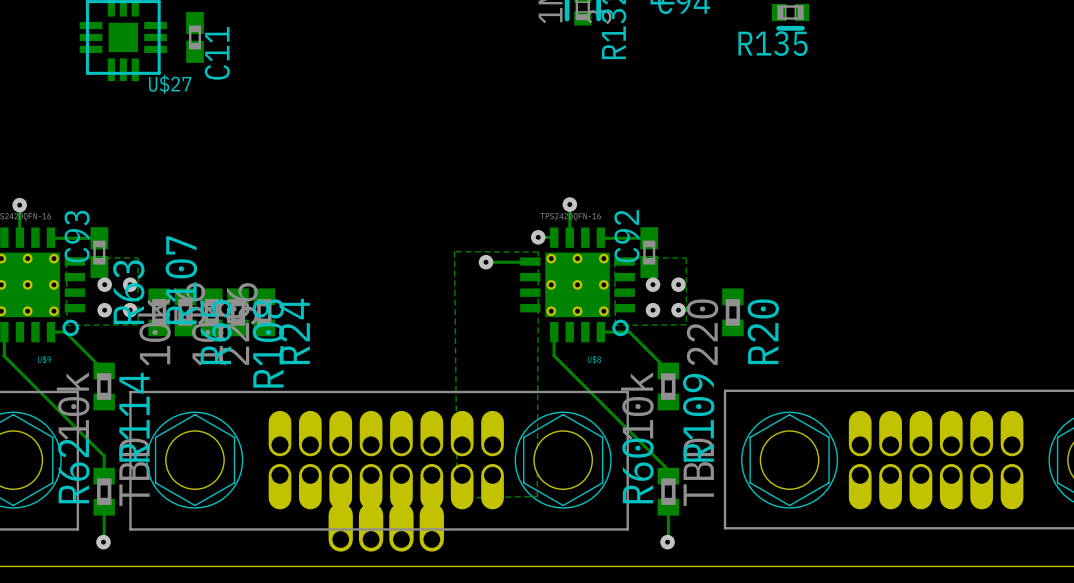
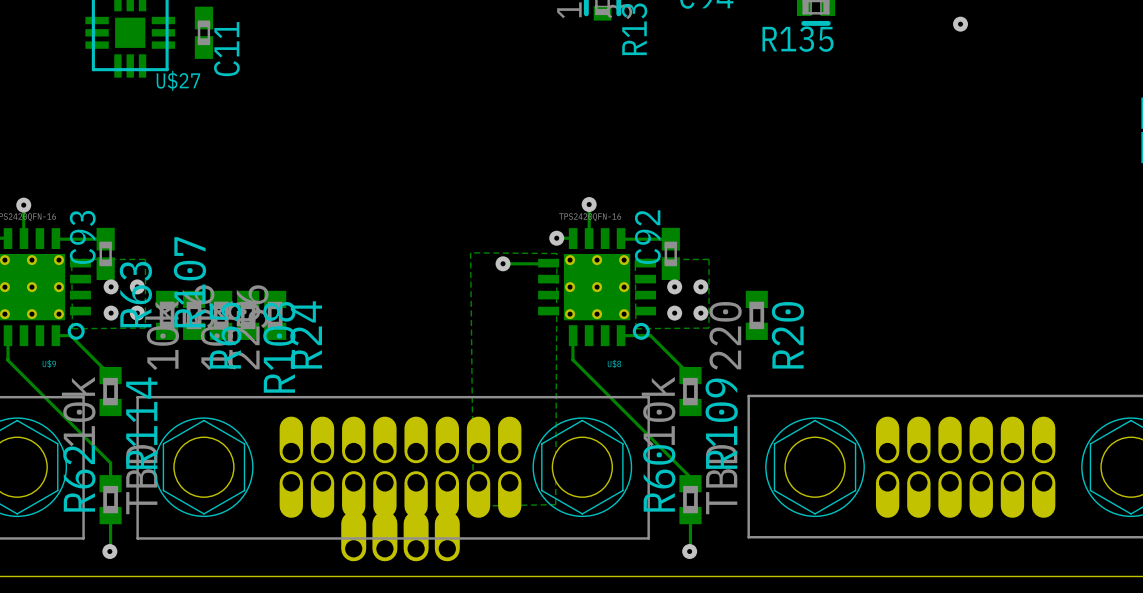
via: none -> (960, 24)

